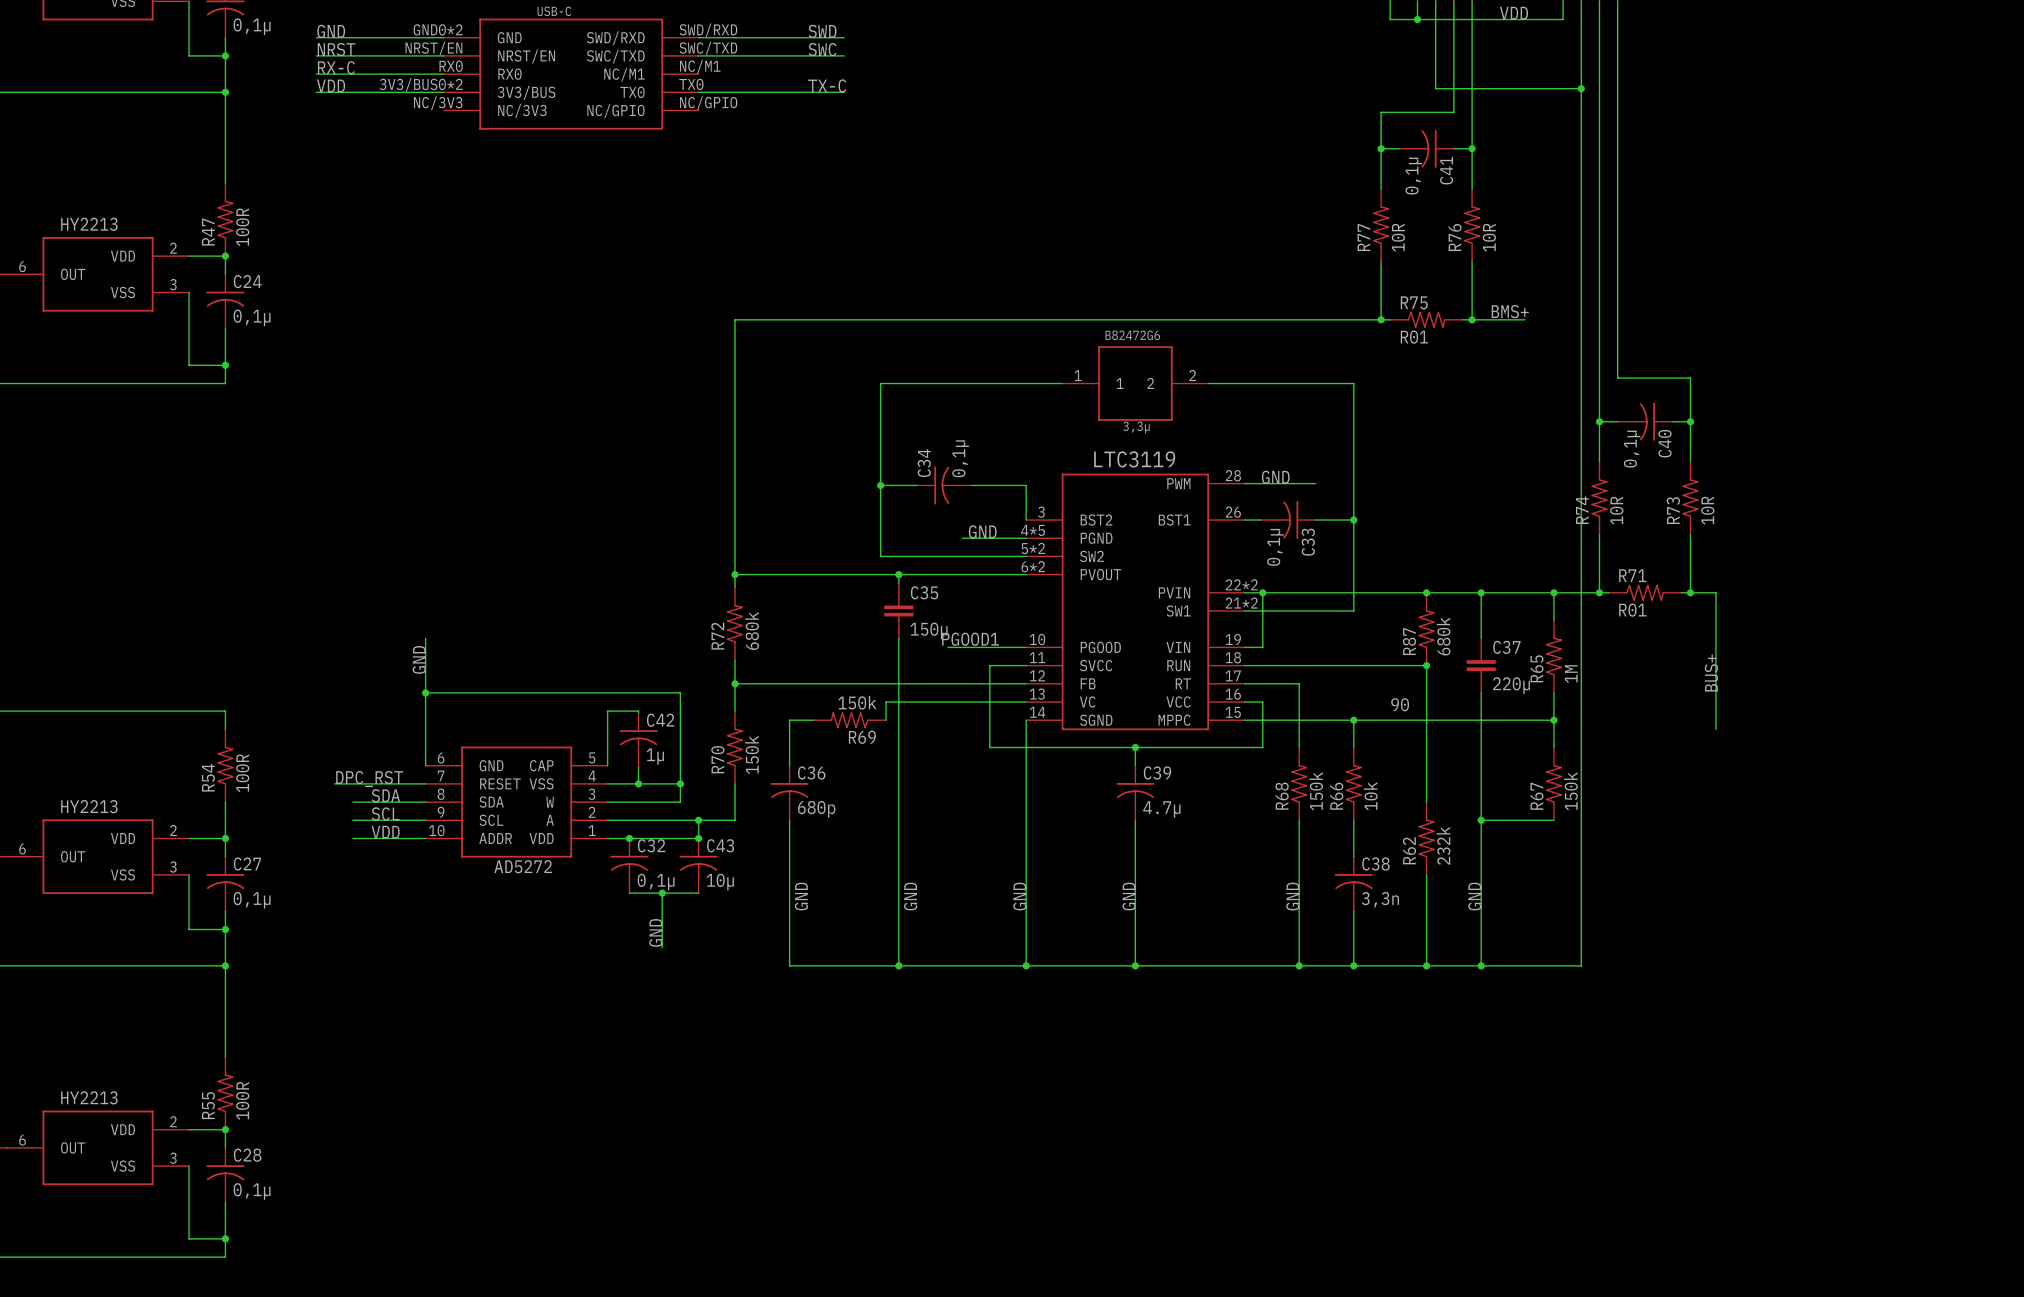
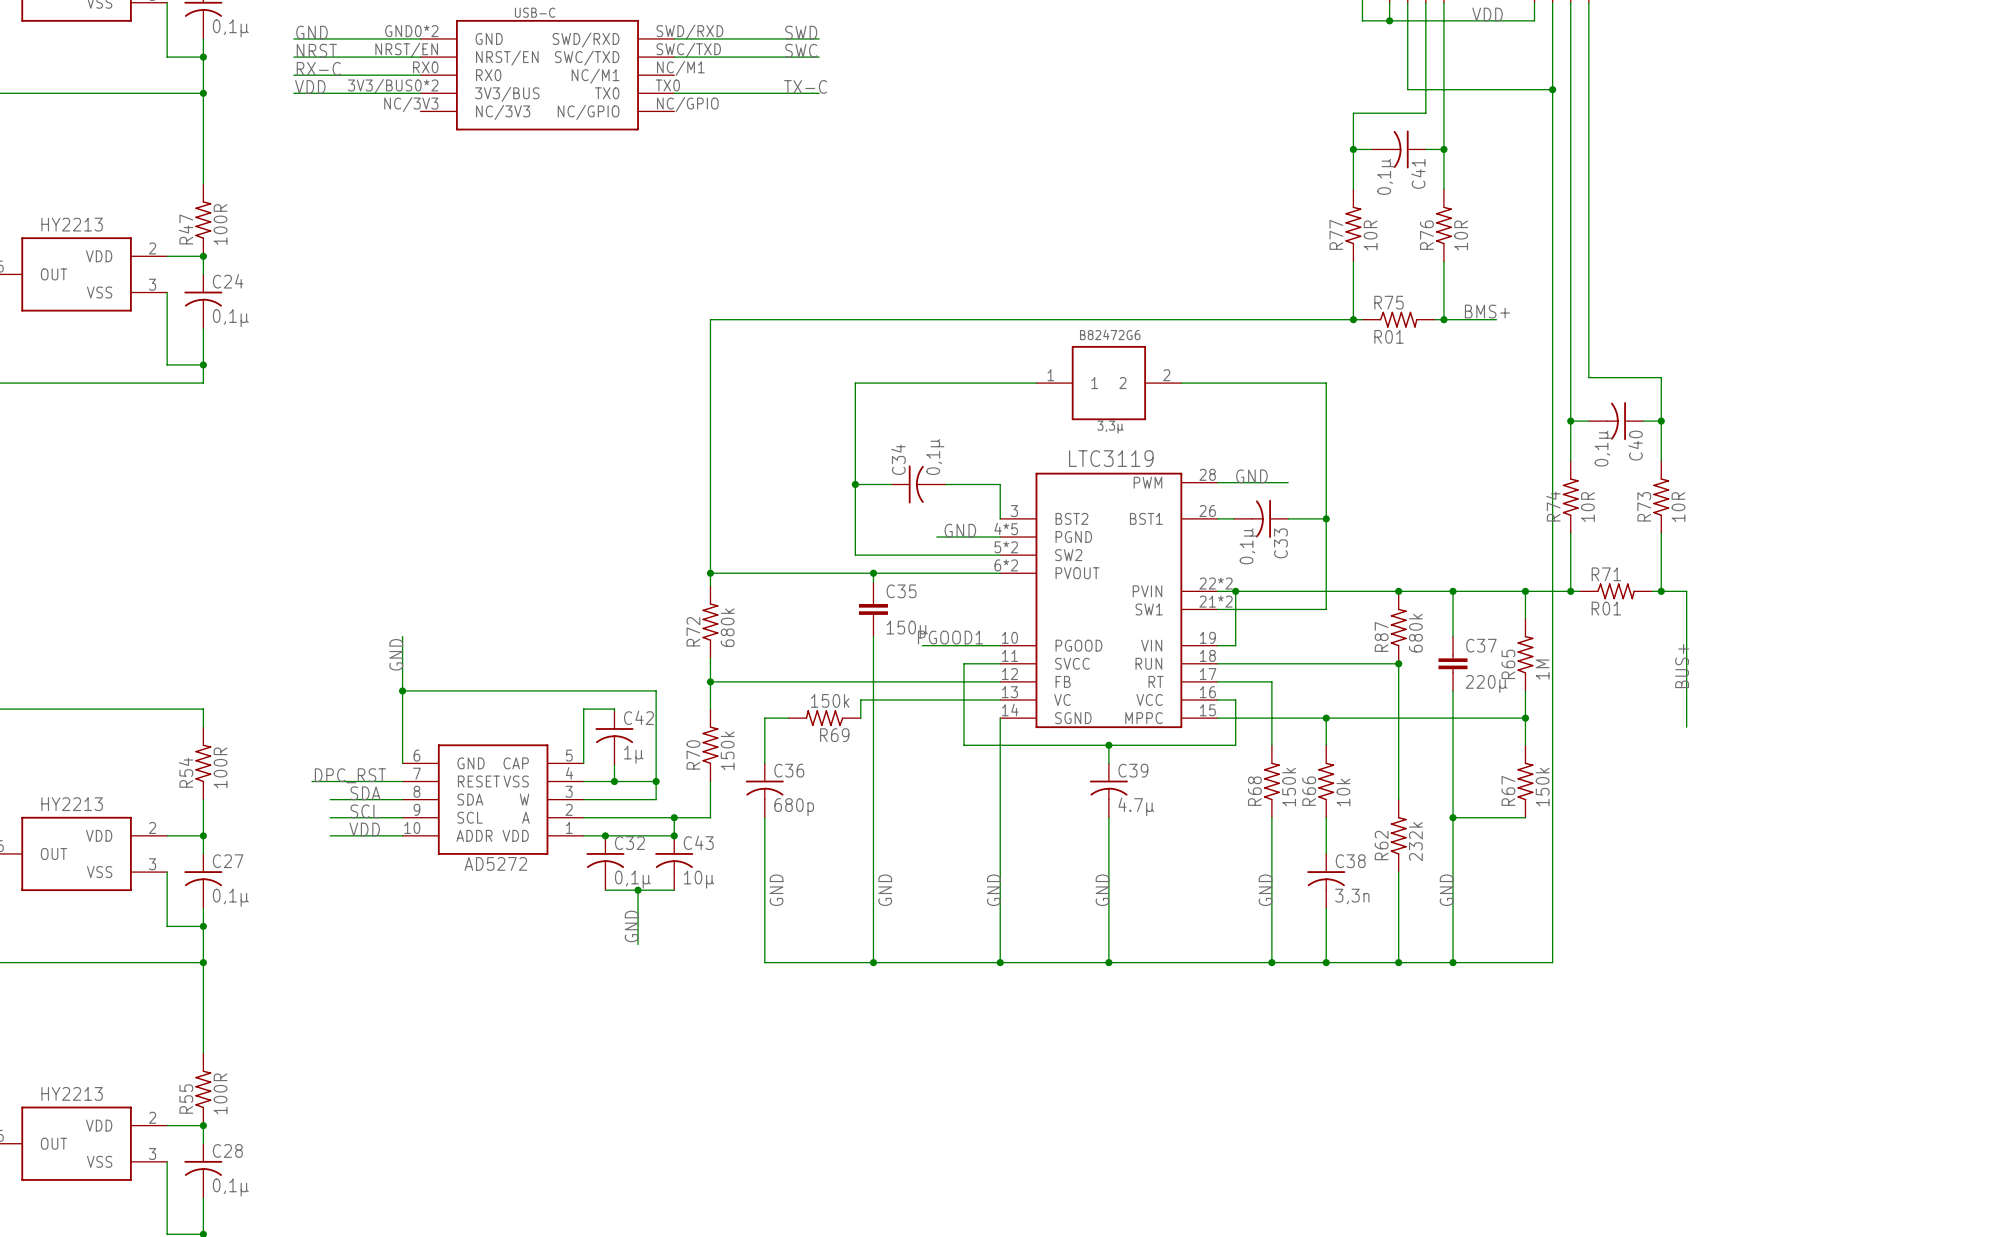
label: 90 (1400, 704) -> none

